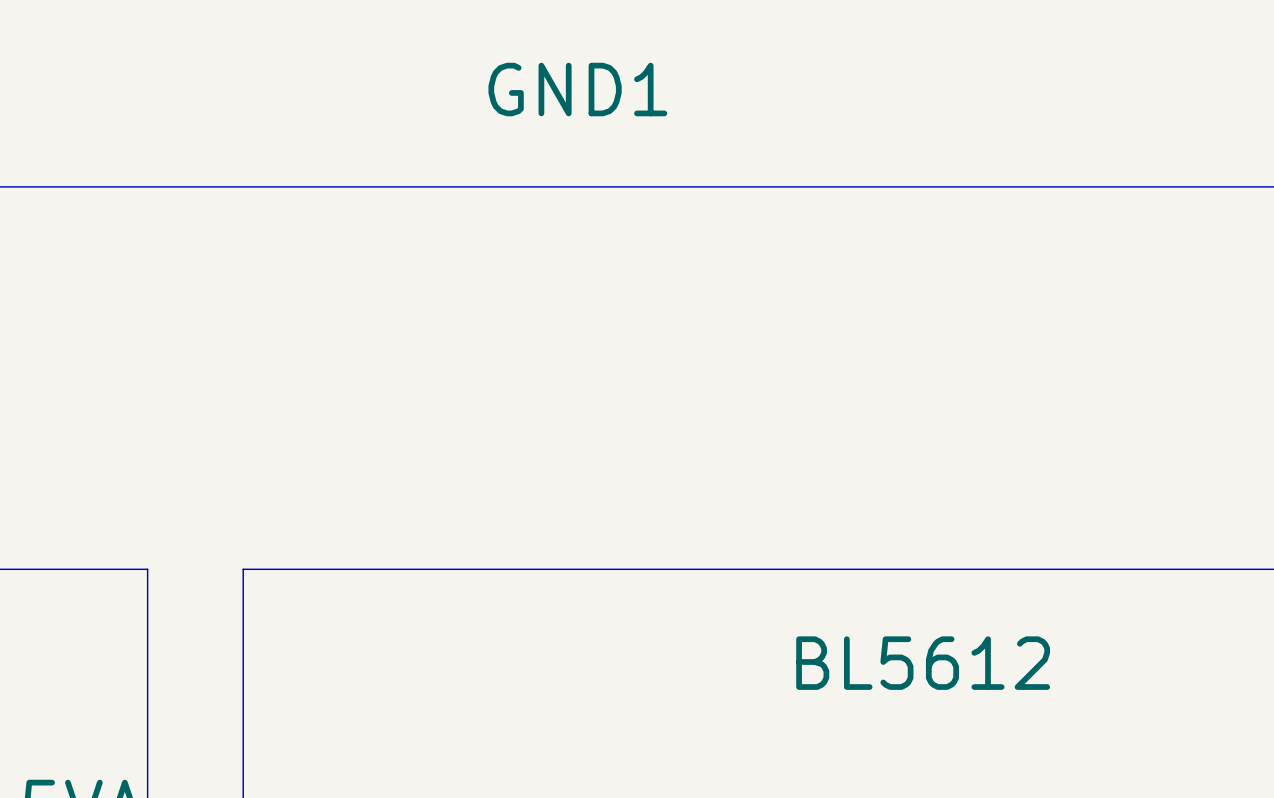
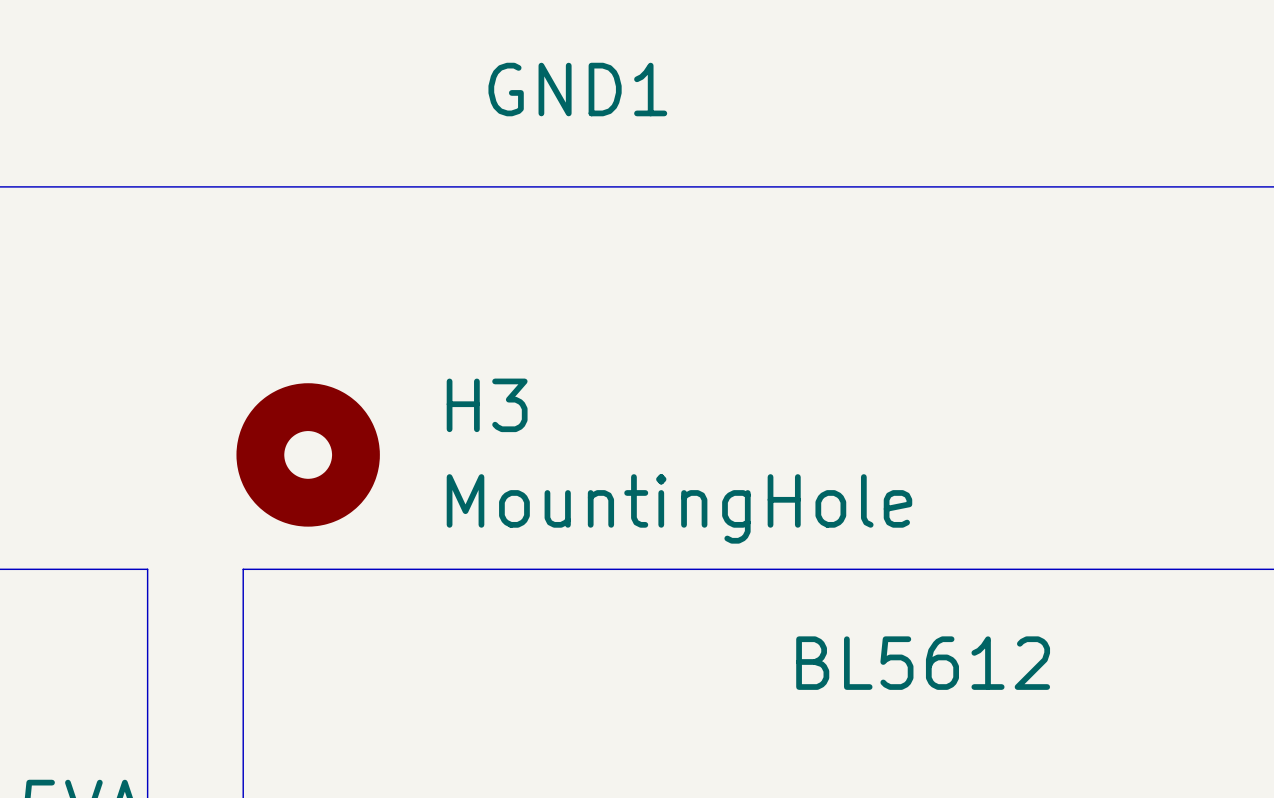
H3: none -> MountingHole (308, 454)

